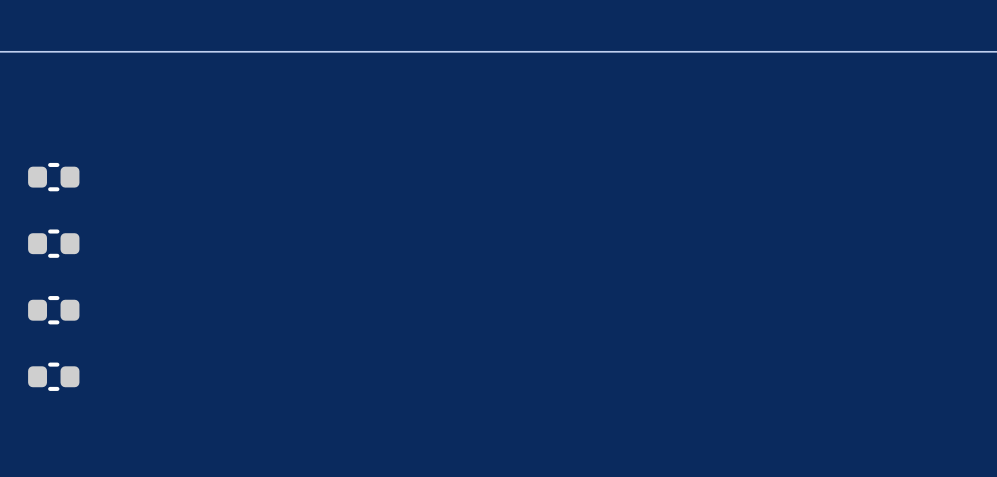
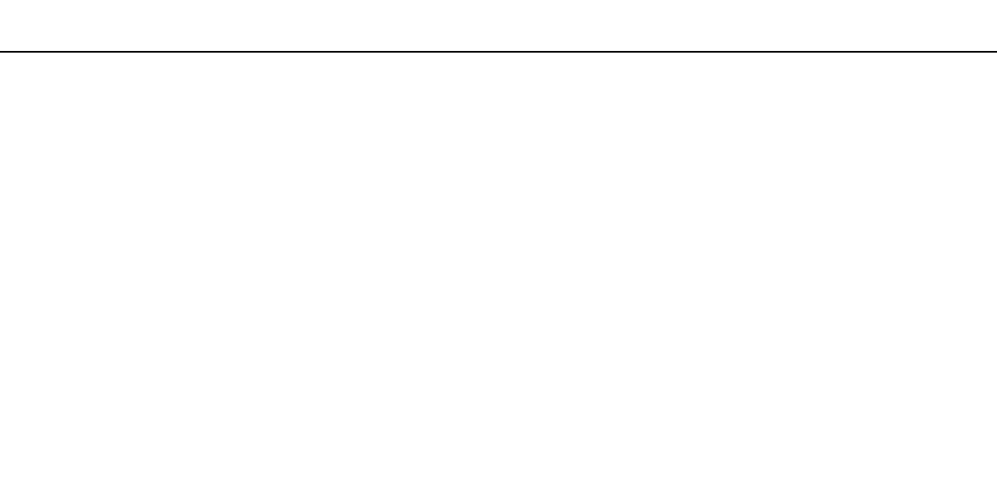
part: (53, 177) -> none
part: (53, 243) -> none
part: (53, 310) -> none
part: (53, 376) -> none

